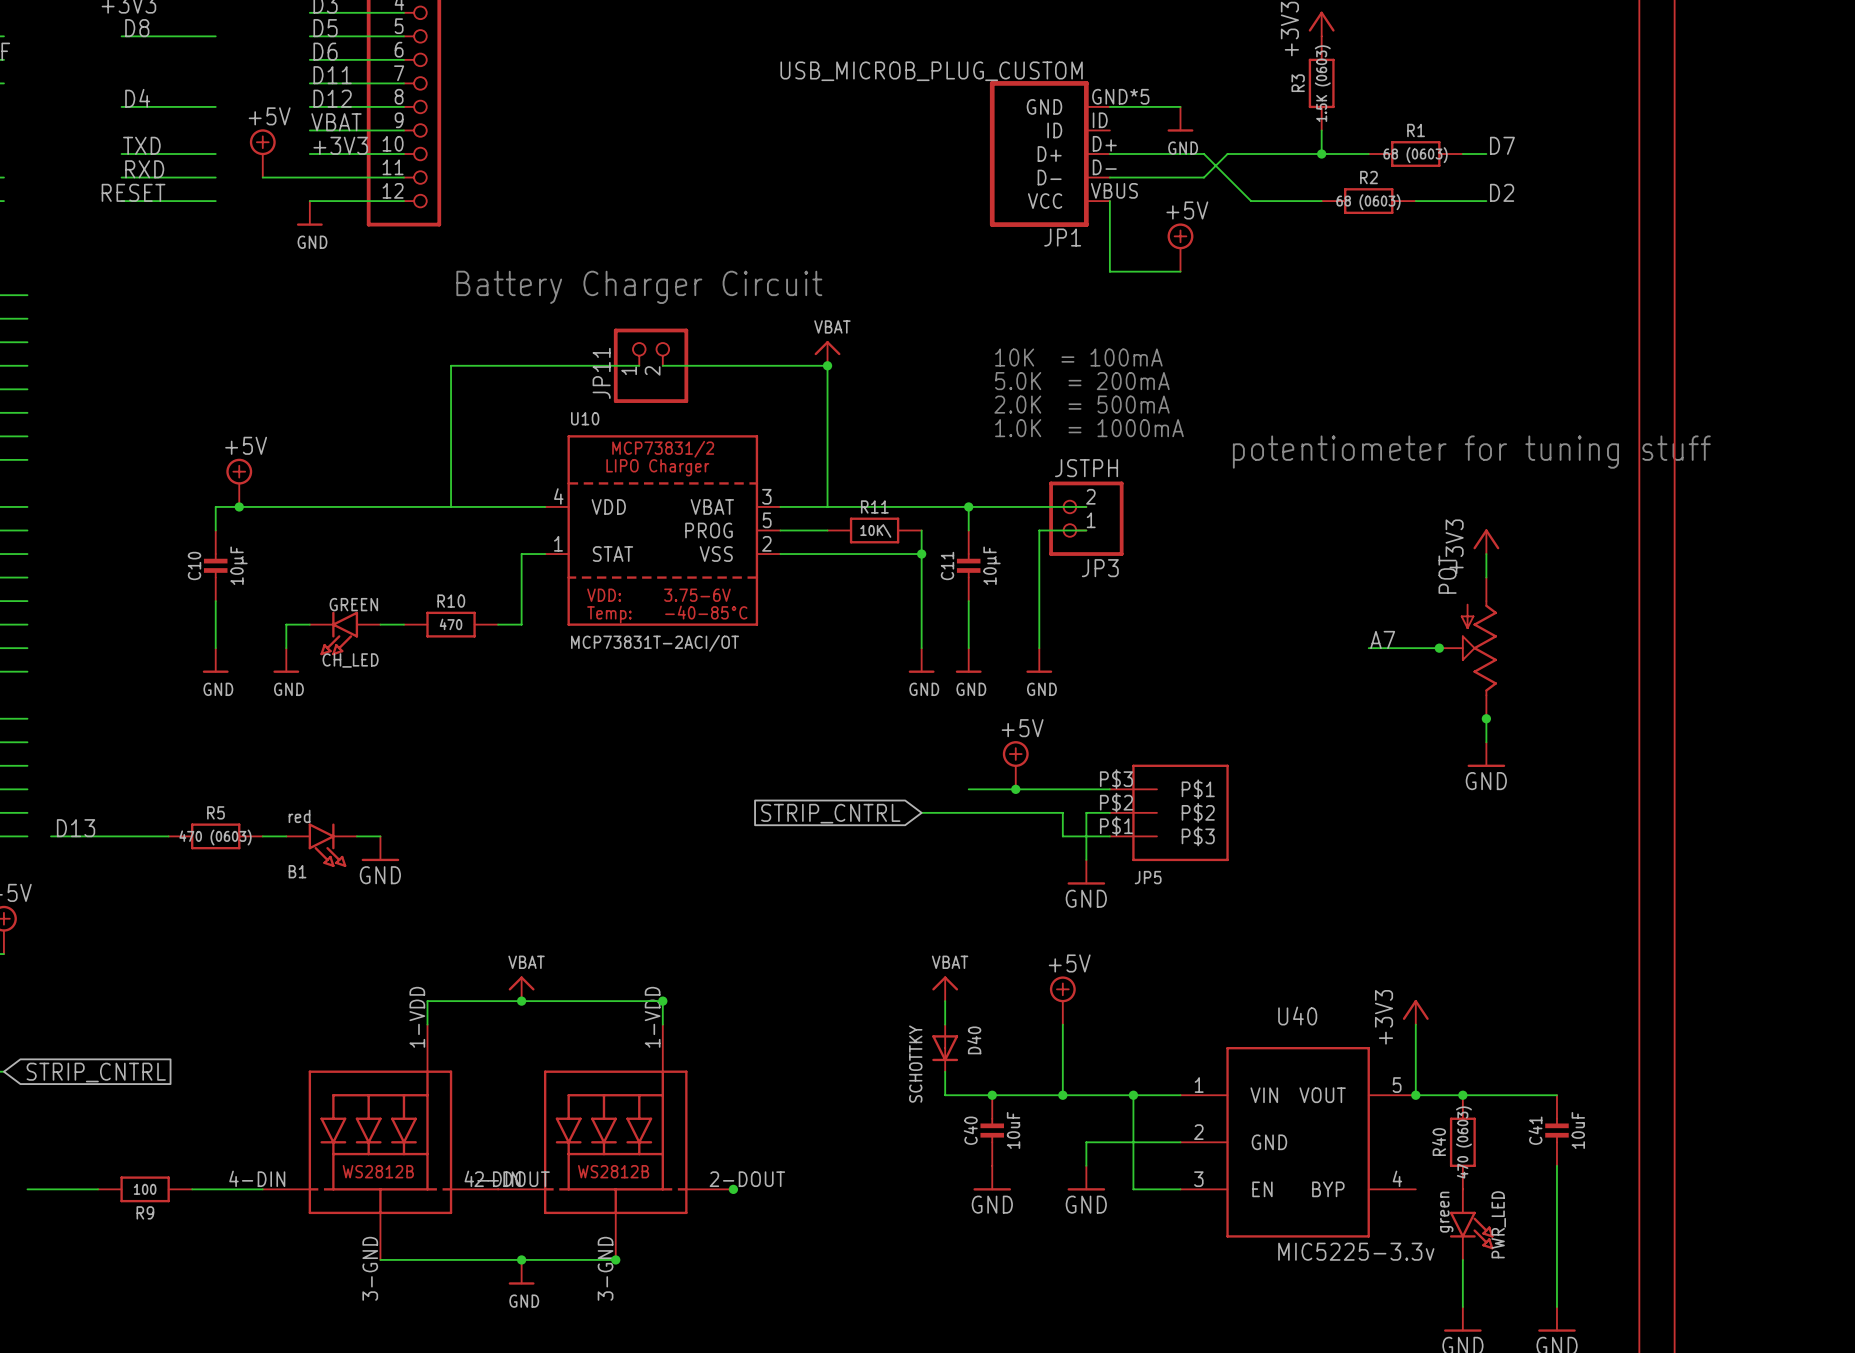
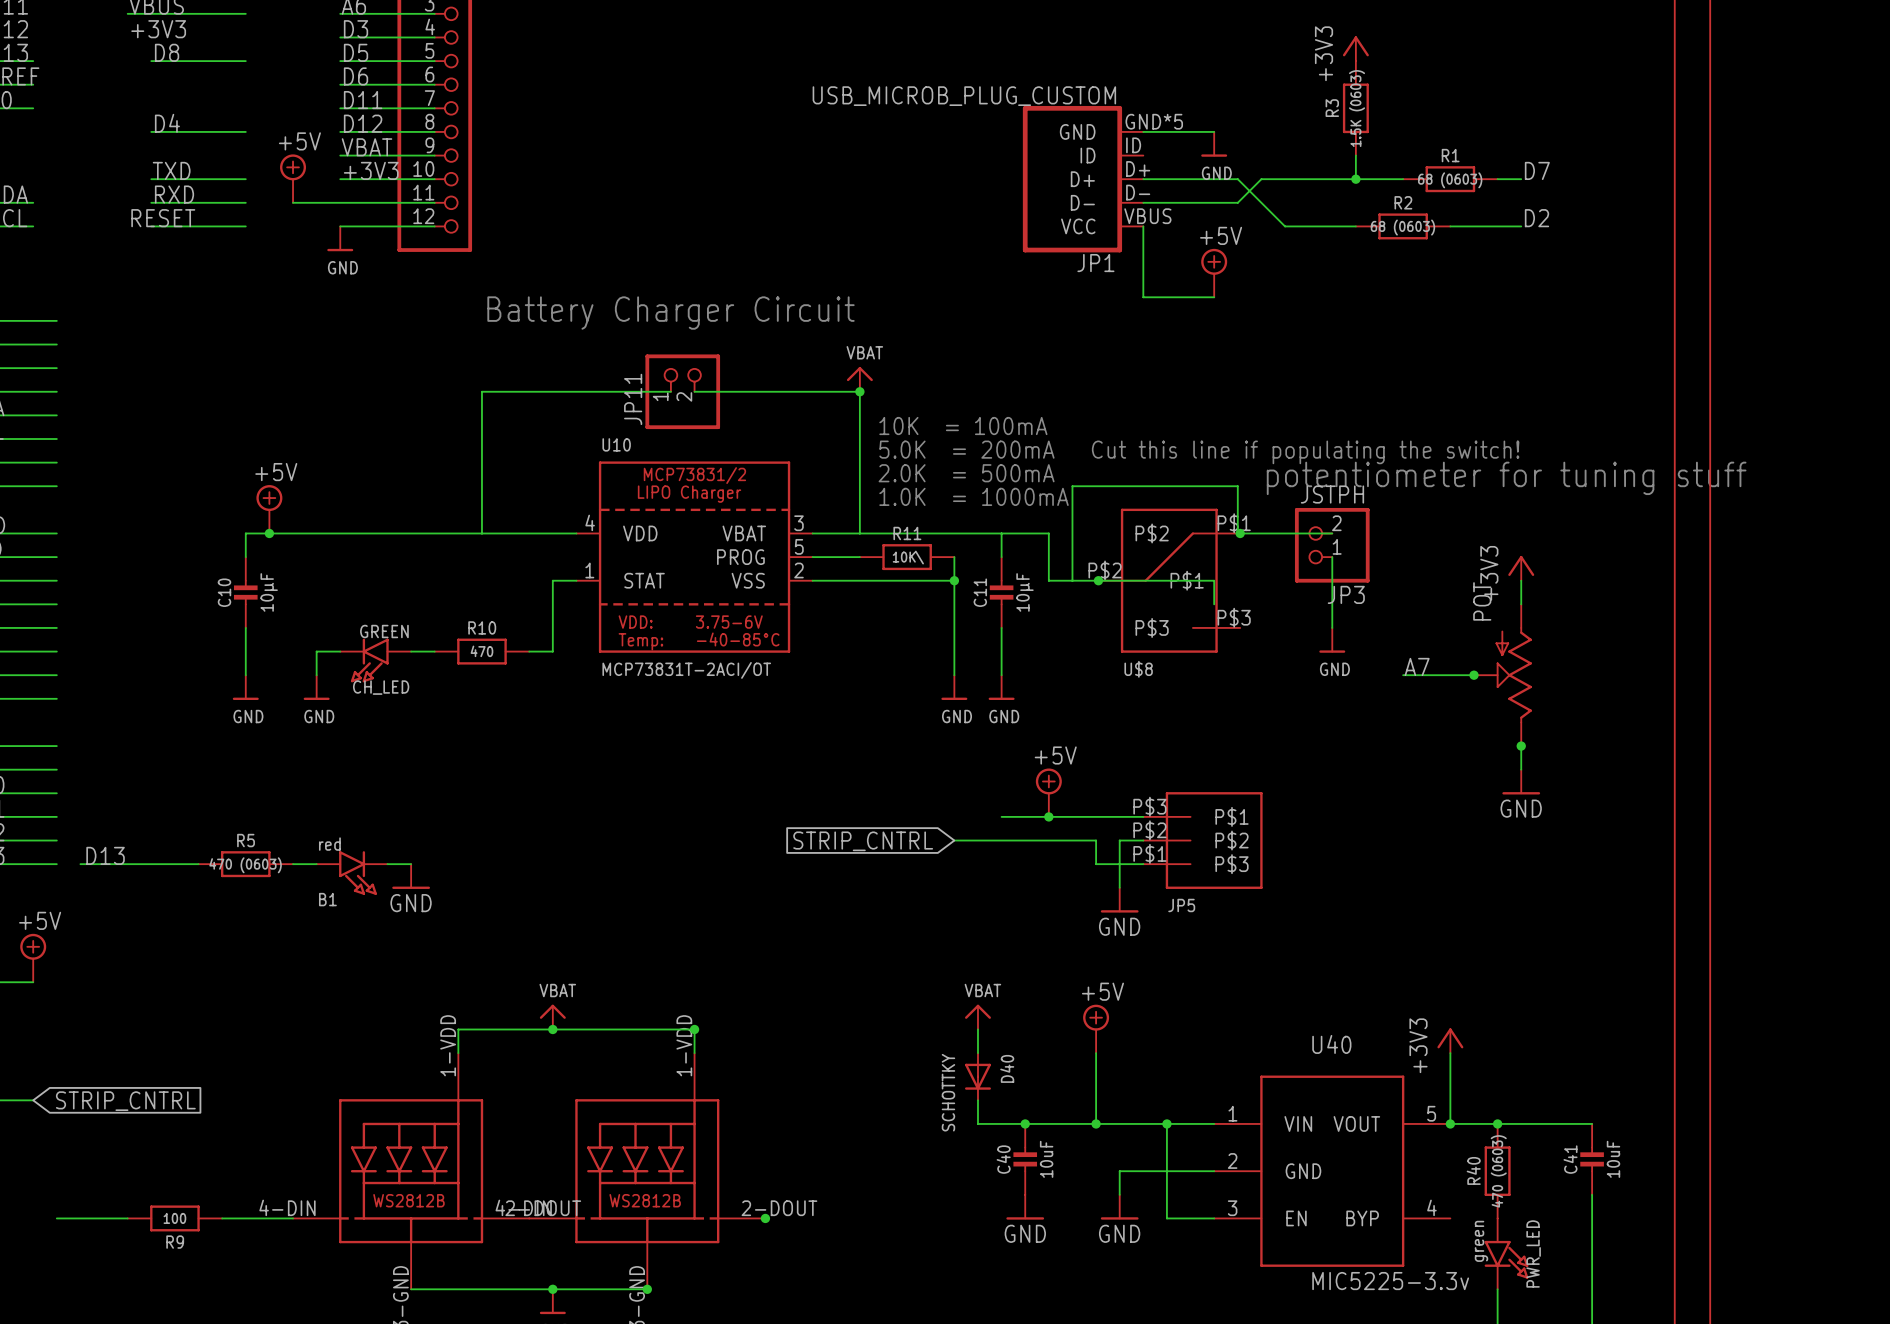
text position: 10K = 100mA (1078, 357) -> 10K = 100mA (963, 426)
text position: 5.0K = 200mA (1082, 381) -> 5.0K = 200mA (966, 449)
text position: 2.0K = 500mA (1082, 404) -> 2.0K = 500mA (966, 473)
text: none -> Cut this line if populating the switch! (1305, 452)
text position: 1.0K = 1000mA (1089, 428) -> 1.0K = 1000mA (974, 496)
junction: (968, 506) -> none
wire: (1015, 506) (1086, 506) -> (1048, 533) (1048, 580) (1214, 580) (1214, 604)
junction: none -> (1240, 533)
JP3 position: (1086, 518) -> (1332, 545)
wire: (1039, 530) (1086, 530) -> (1072, 557) (1072, 486) (1237, 486) (1237, 533) (1332, 533)
wire: none -> (1332, 557) (1332, 627)
wire: (1039, 554) (1039, 648) -> none
junction: none -> (1098, 580)
U$8: none -> (1169, 580)
power symbol: none -> GND (1332, 640)
power symbol: GND (1039, 660) -> none

